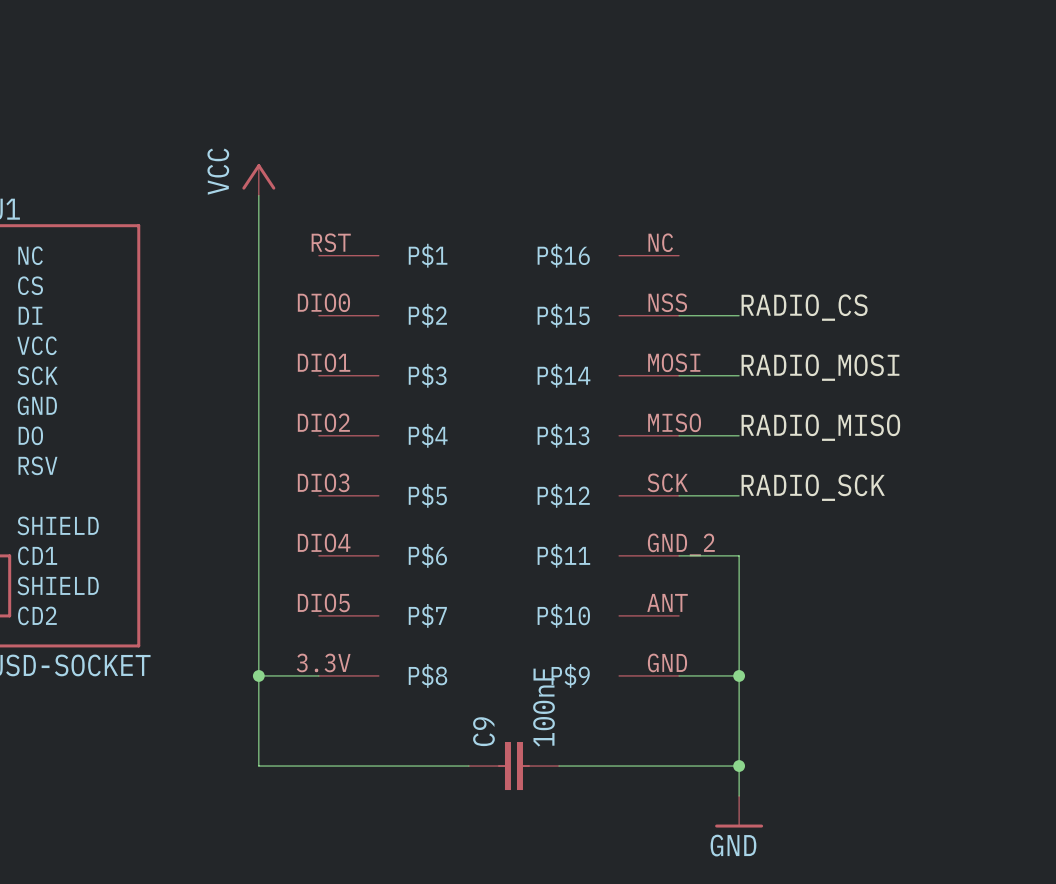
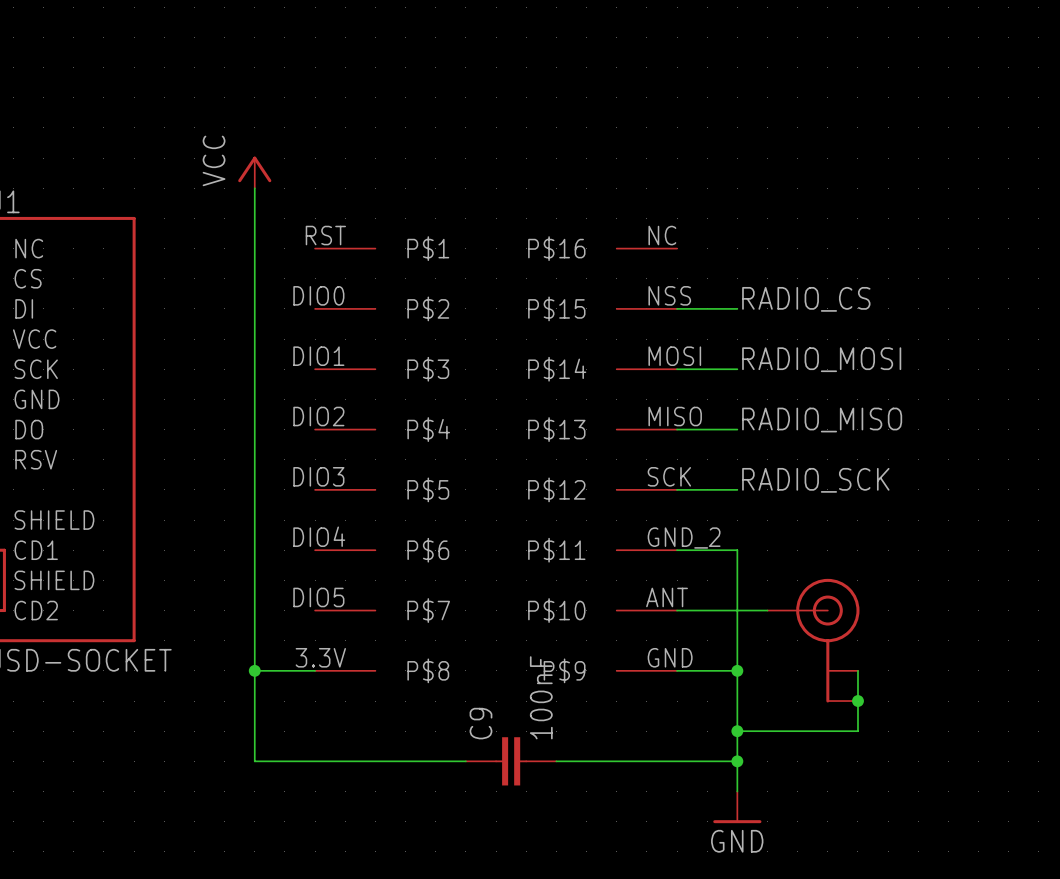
wire: none -> (677, 610) (767, 610)
part: none -> (813, 640)
wire: none -> (857, 670) (857, 731) (737, 731)
junction: none -> (857, 701)
junction: none -> (737, 731)

